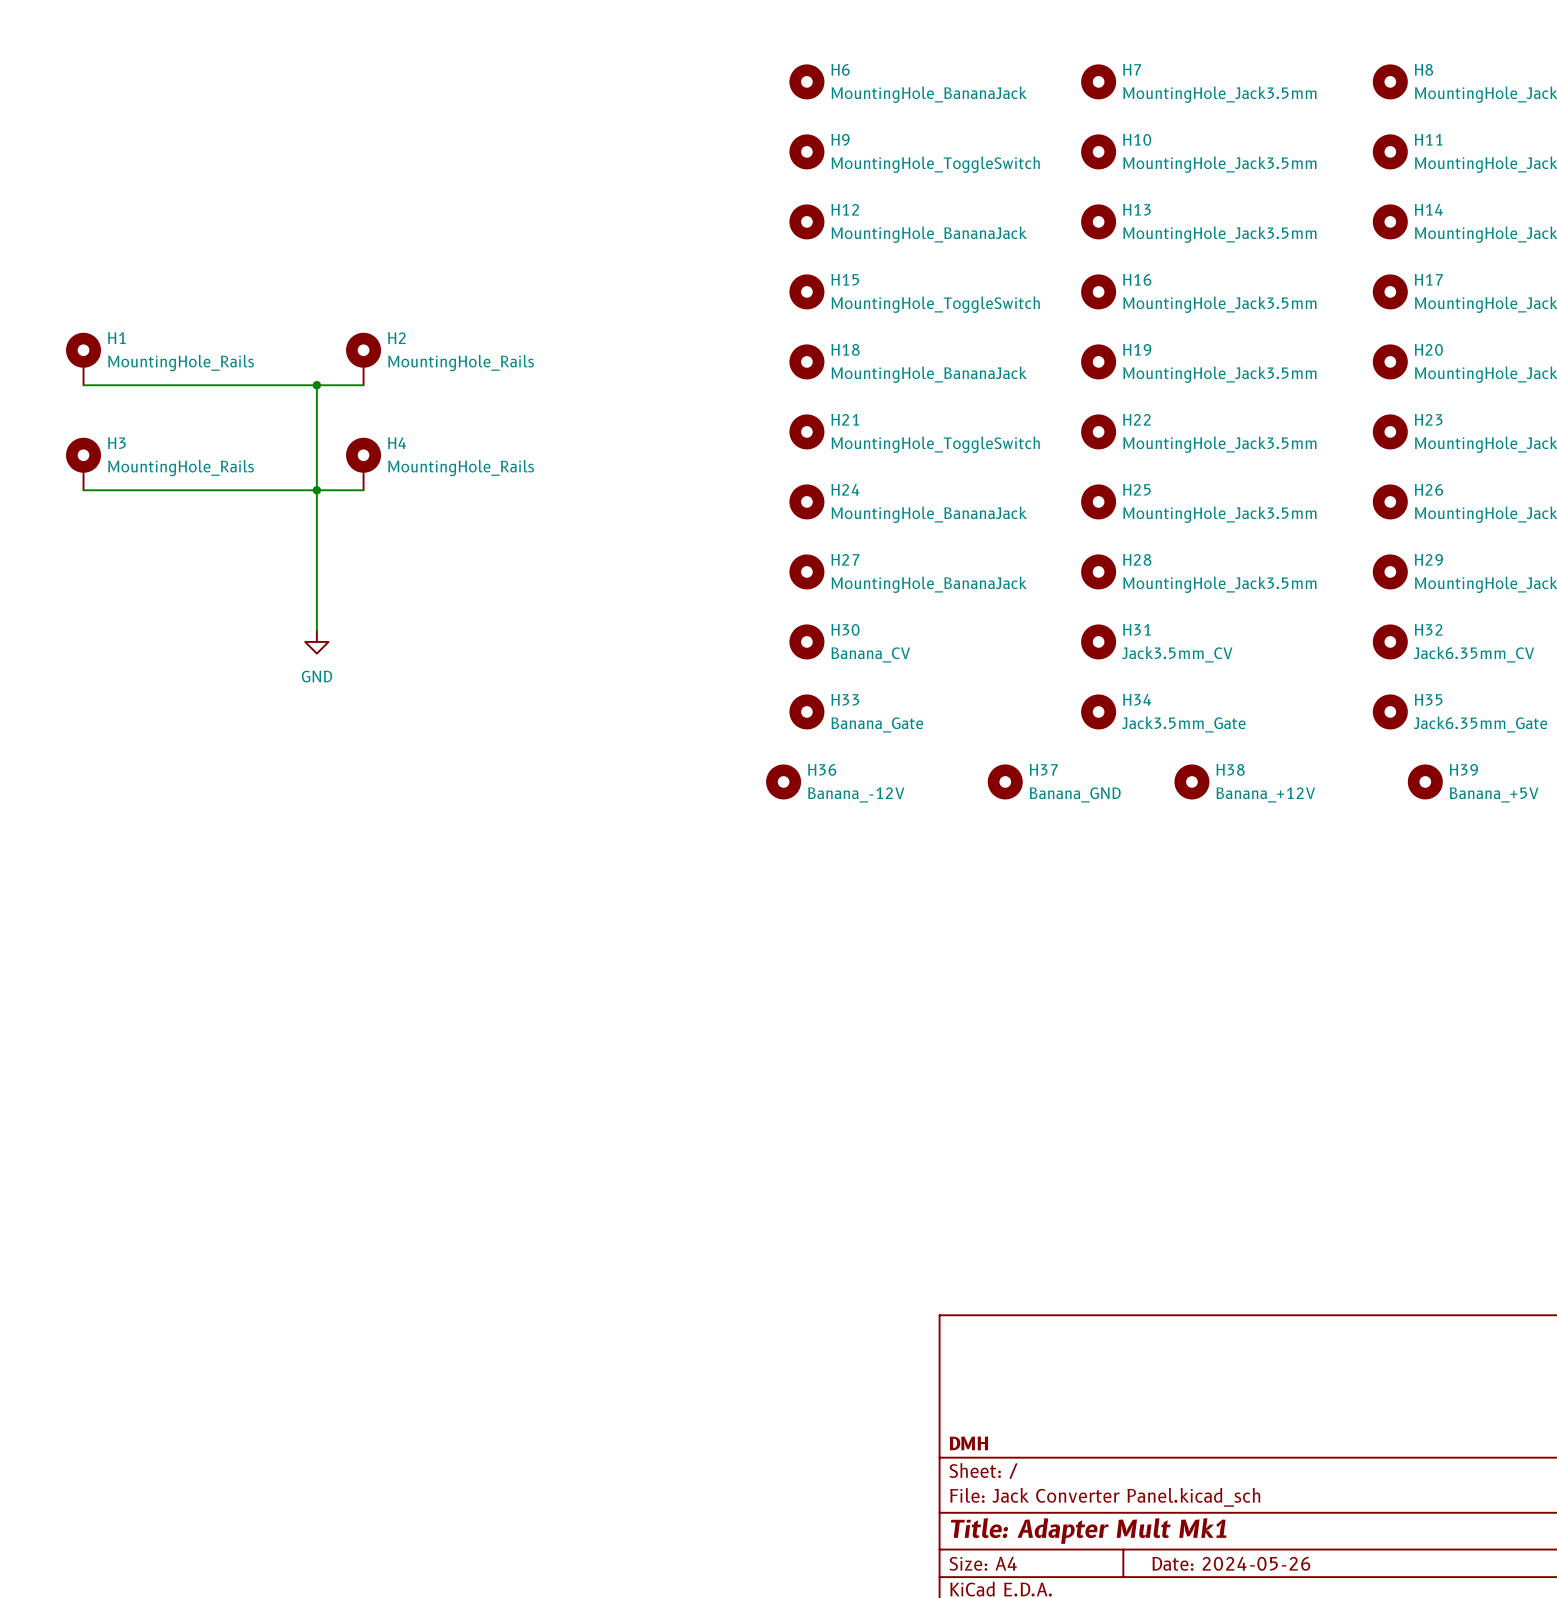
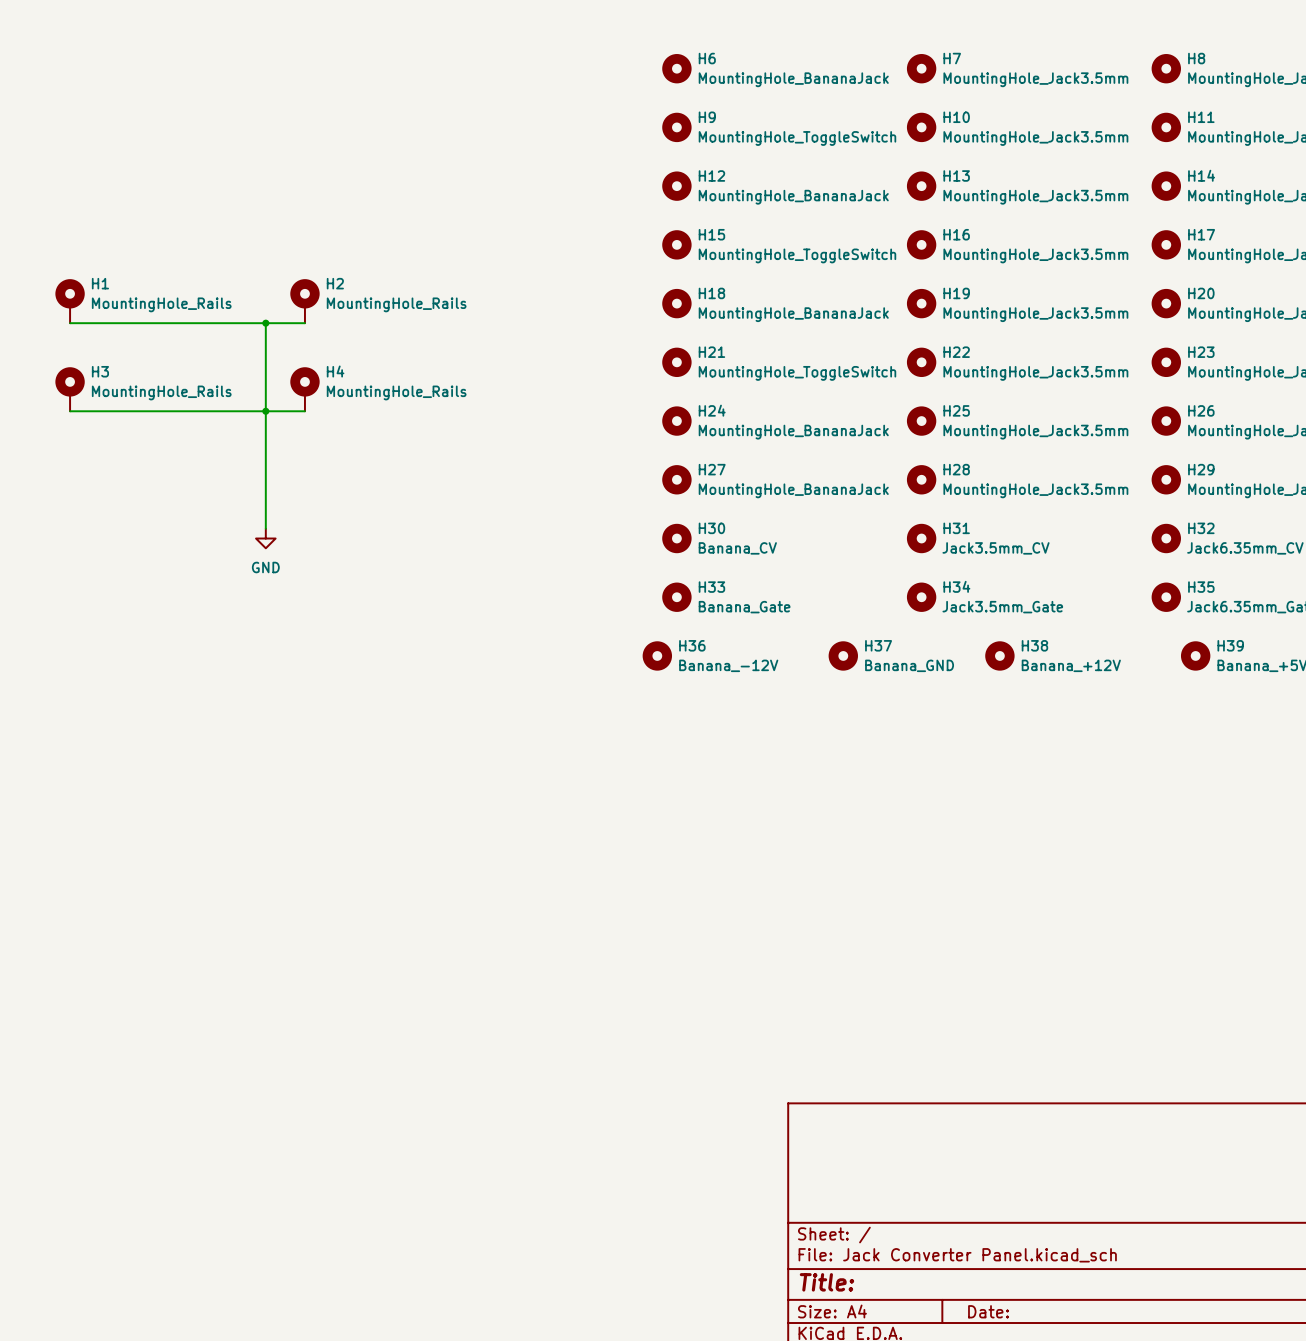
title block: DMH (968, 1443) -> none
title block: Title: Adapter Mult Mk1 (1088, 1531) -> Title: (826, 1282)
title block: Date: 2024-05-26 (1231, 1563) -> Date: (988, 1311)

